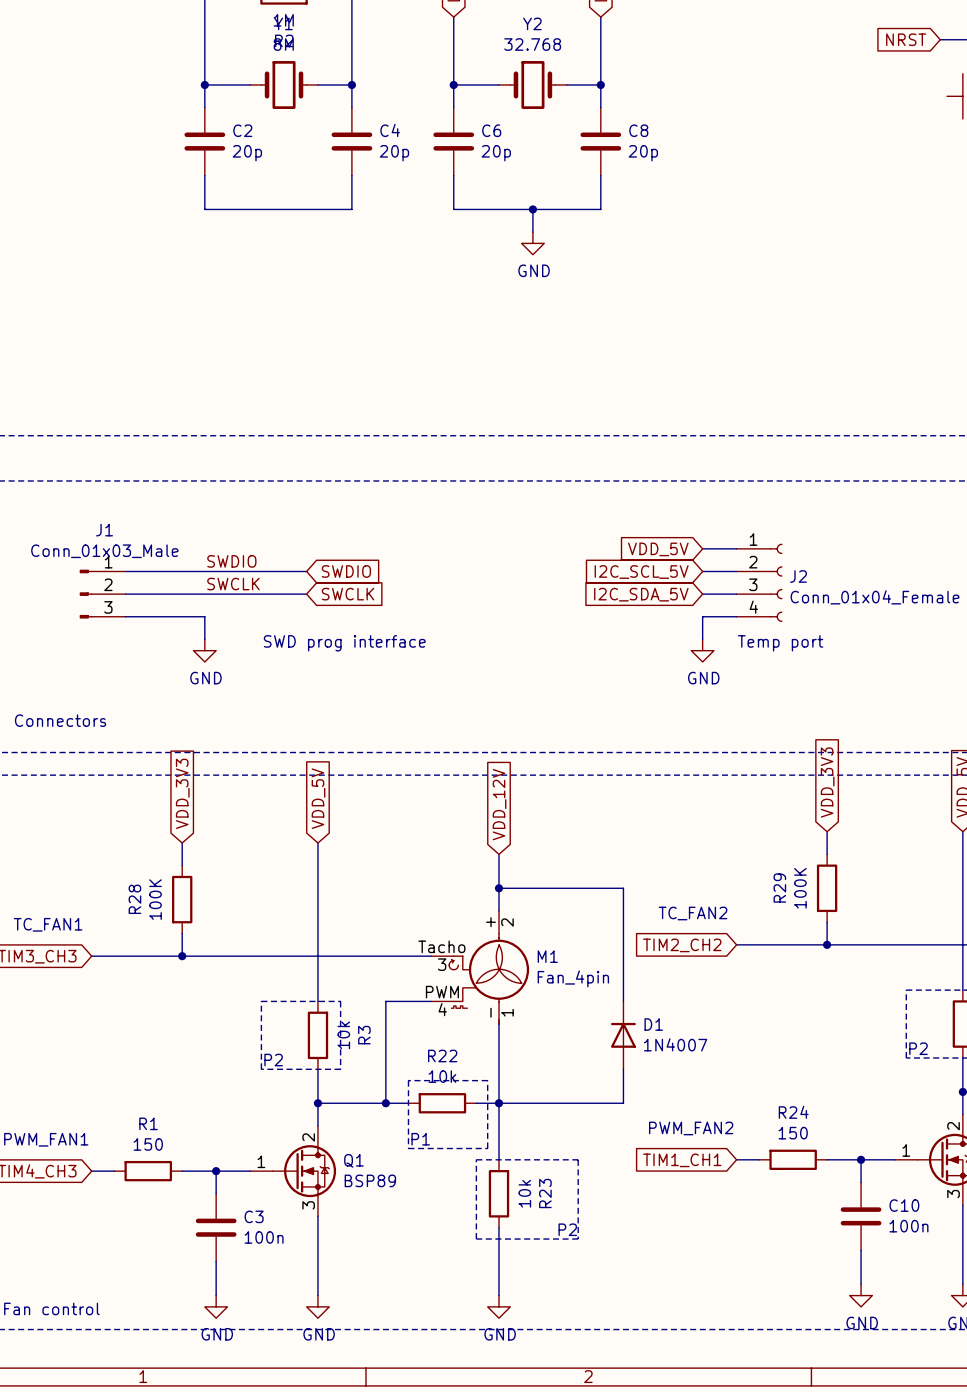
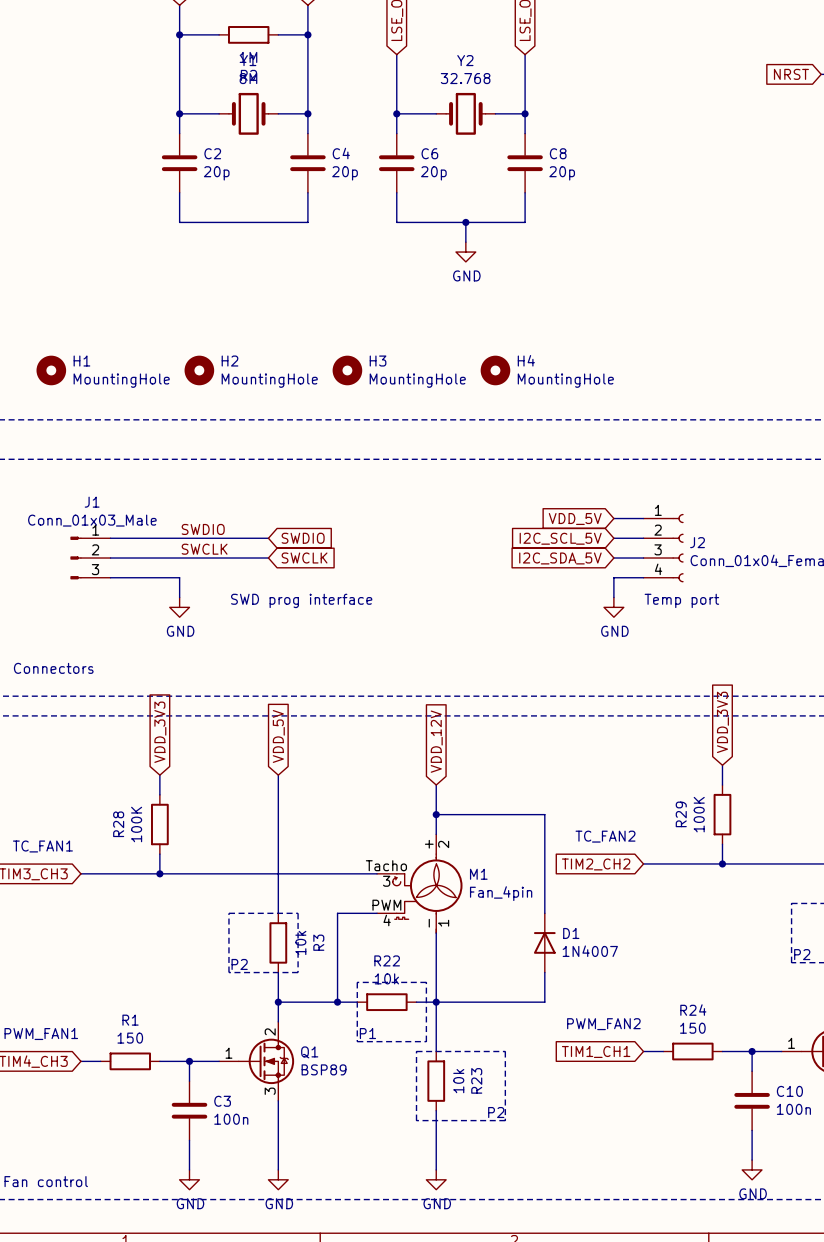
H1: none -> MountingHole (51, 370)
H2: none -> MountingHole (199, 370)
H3: none -> MountingHole (347, 370)
H4: none -> MountingHole (495, 370)

